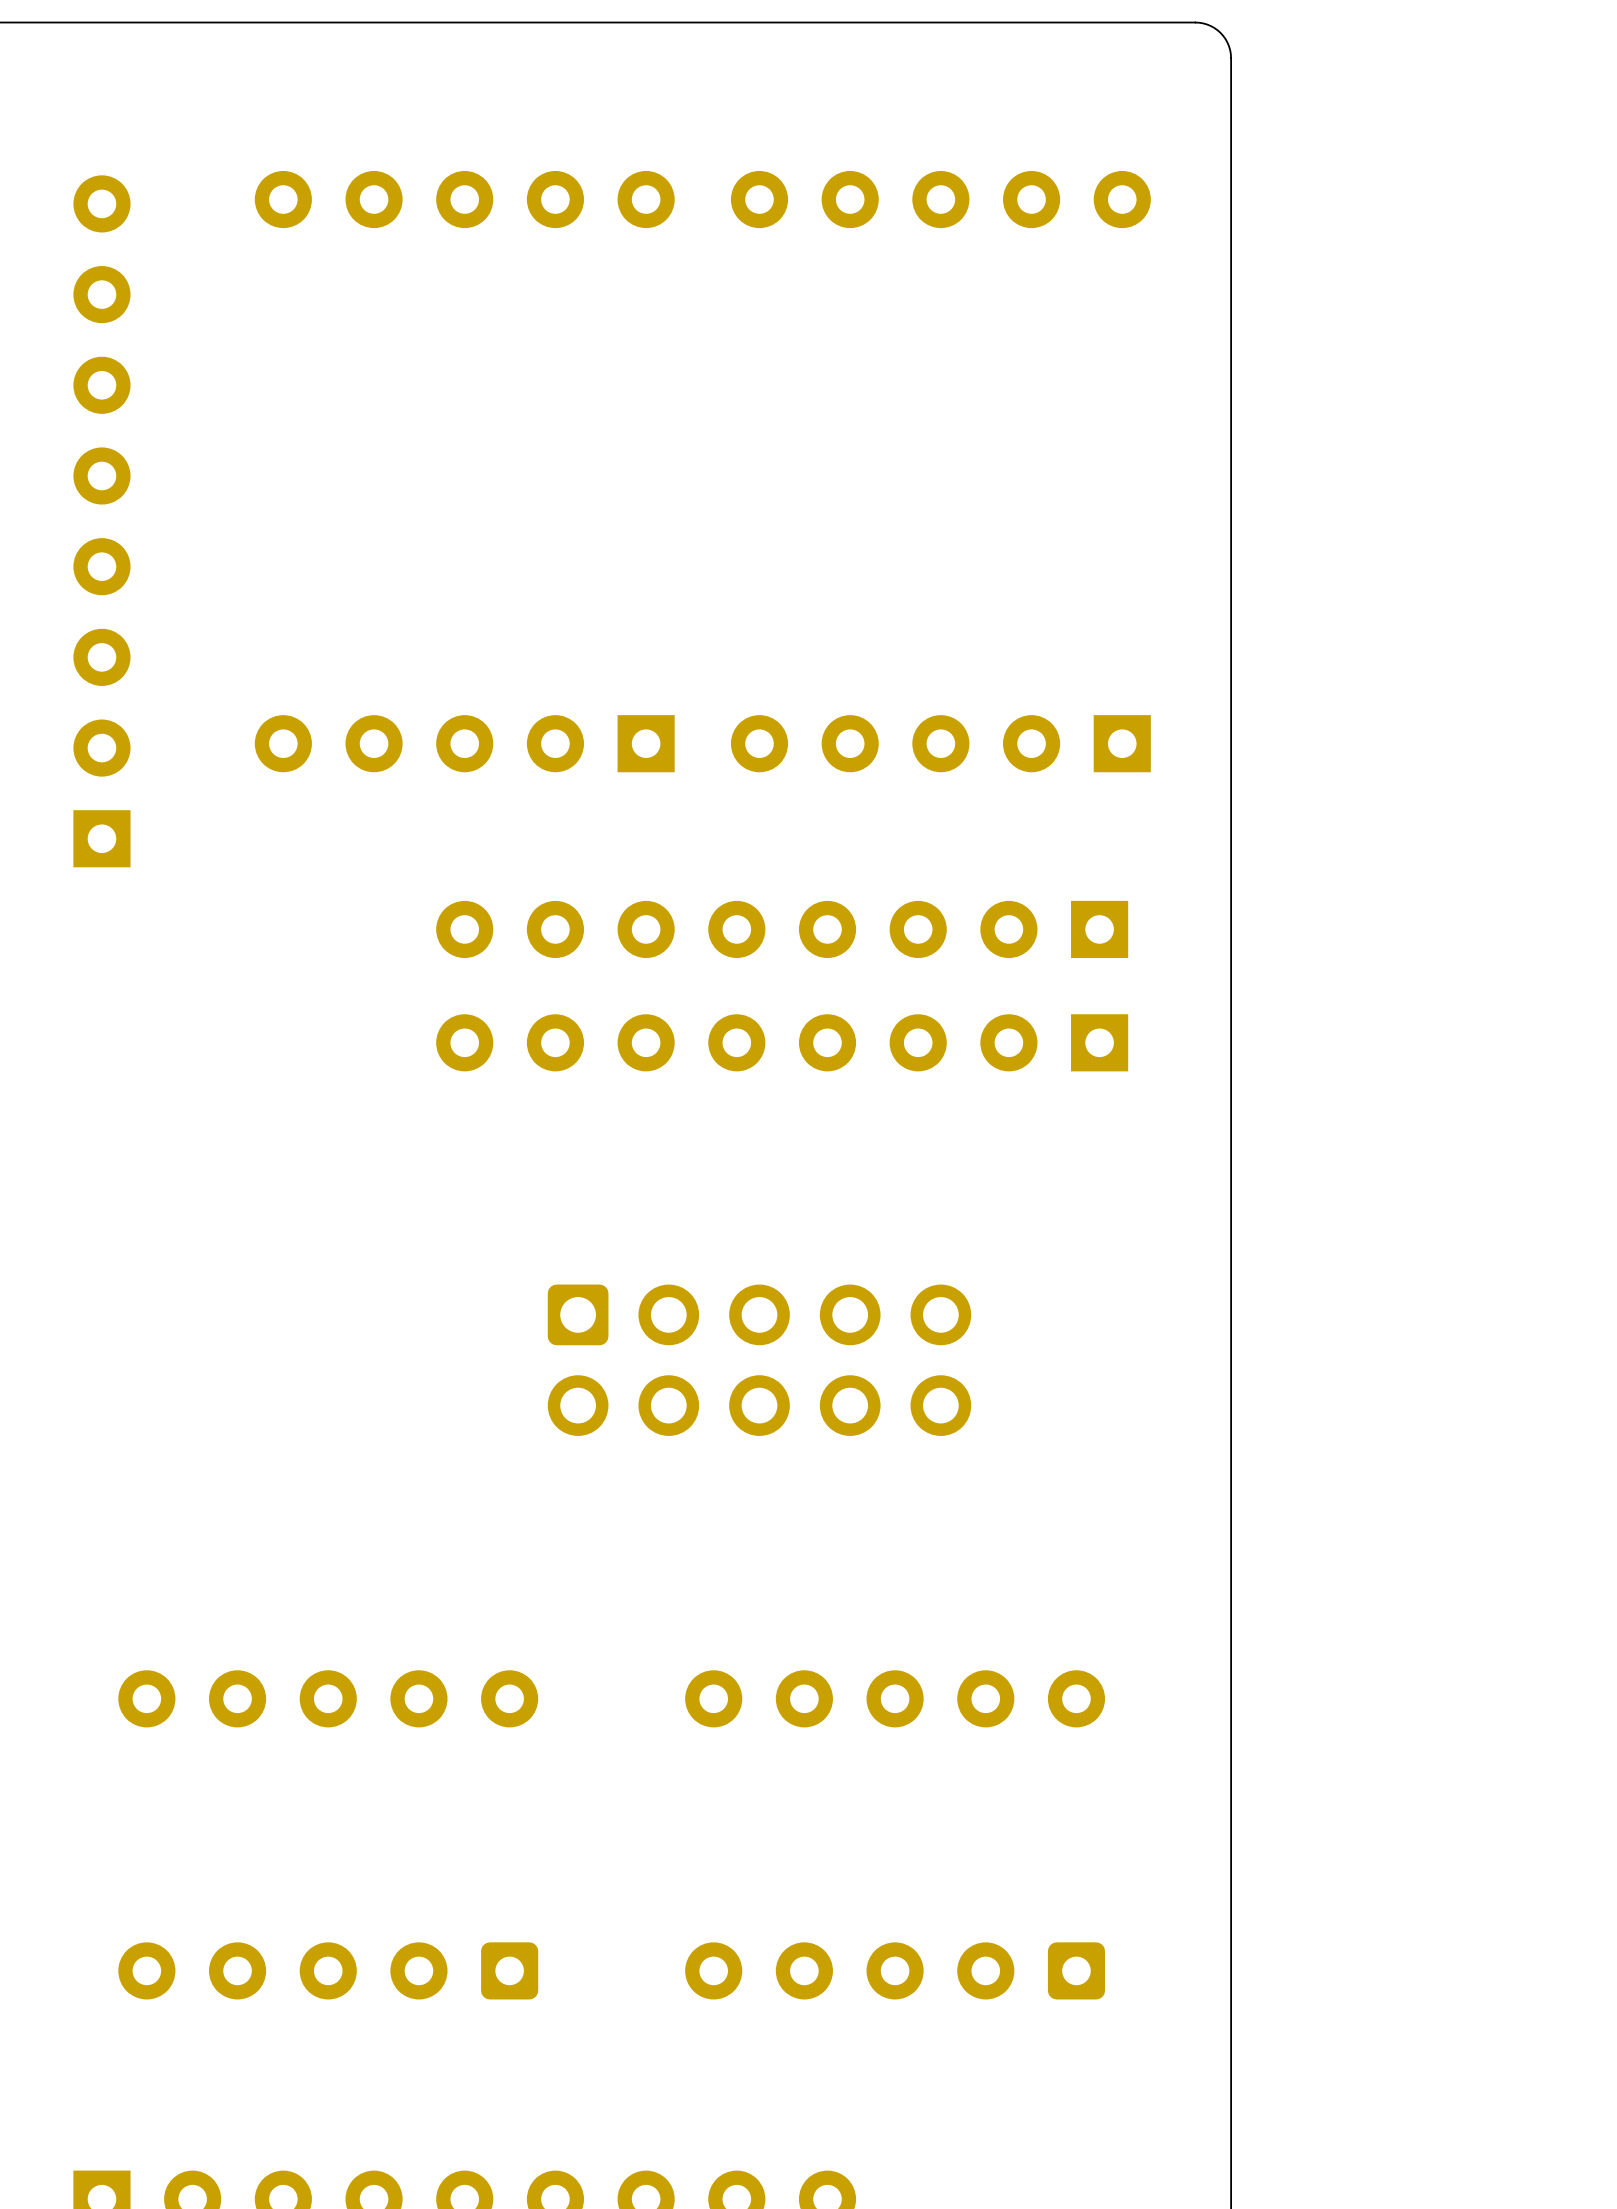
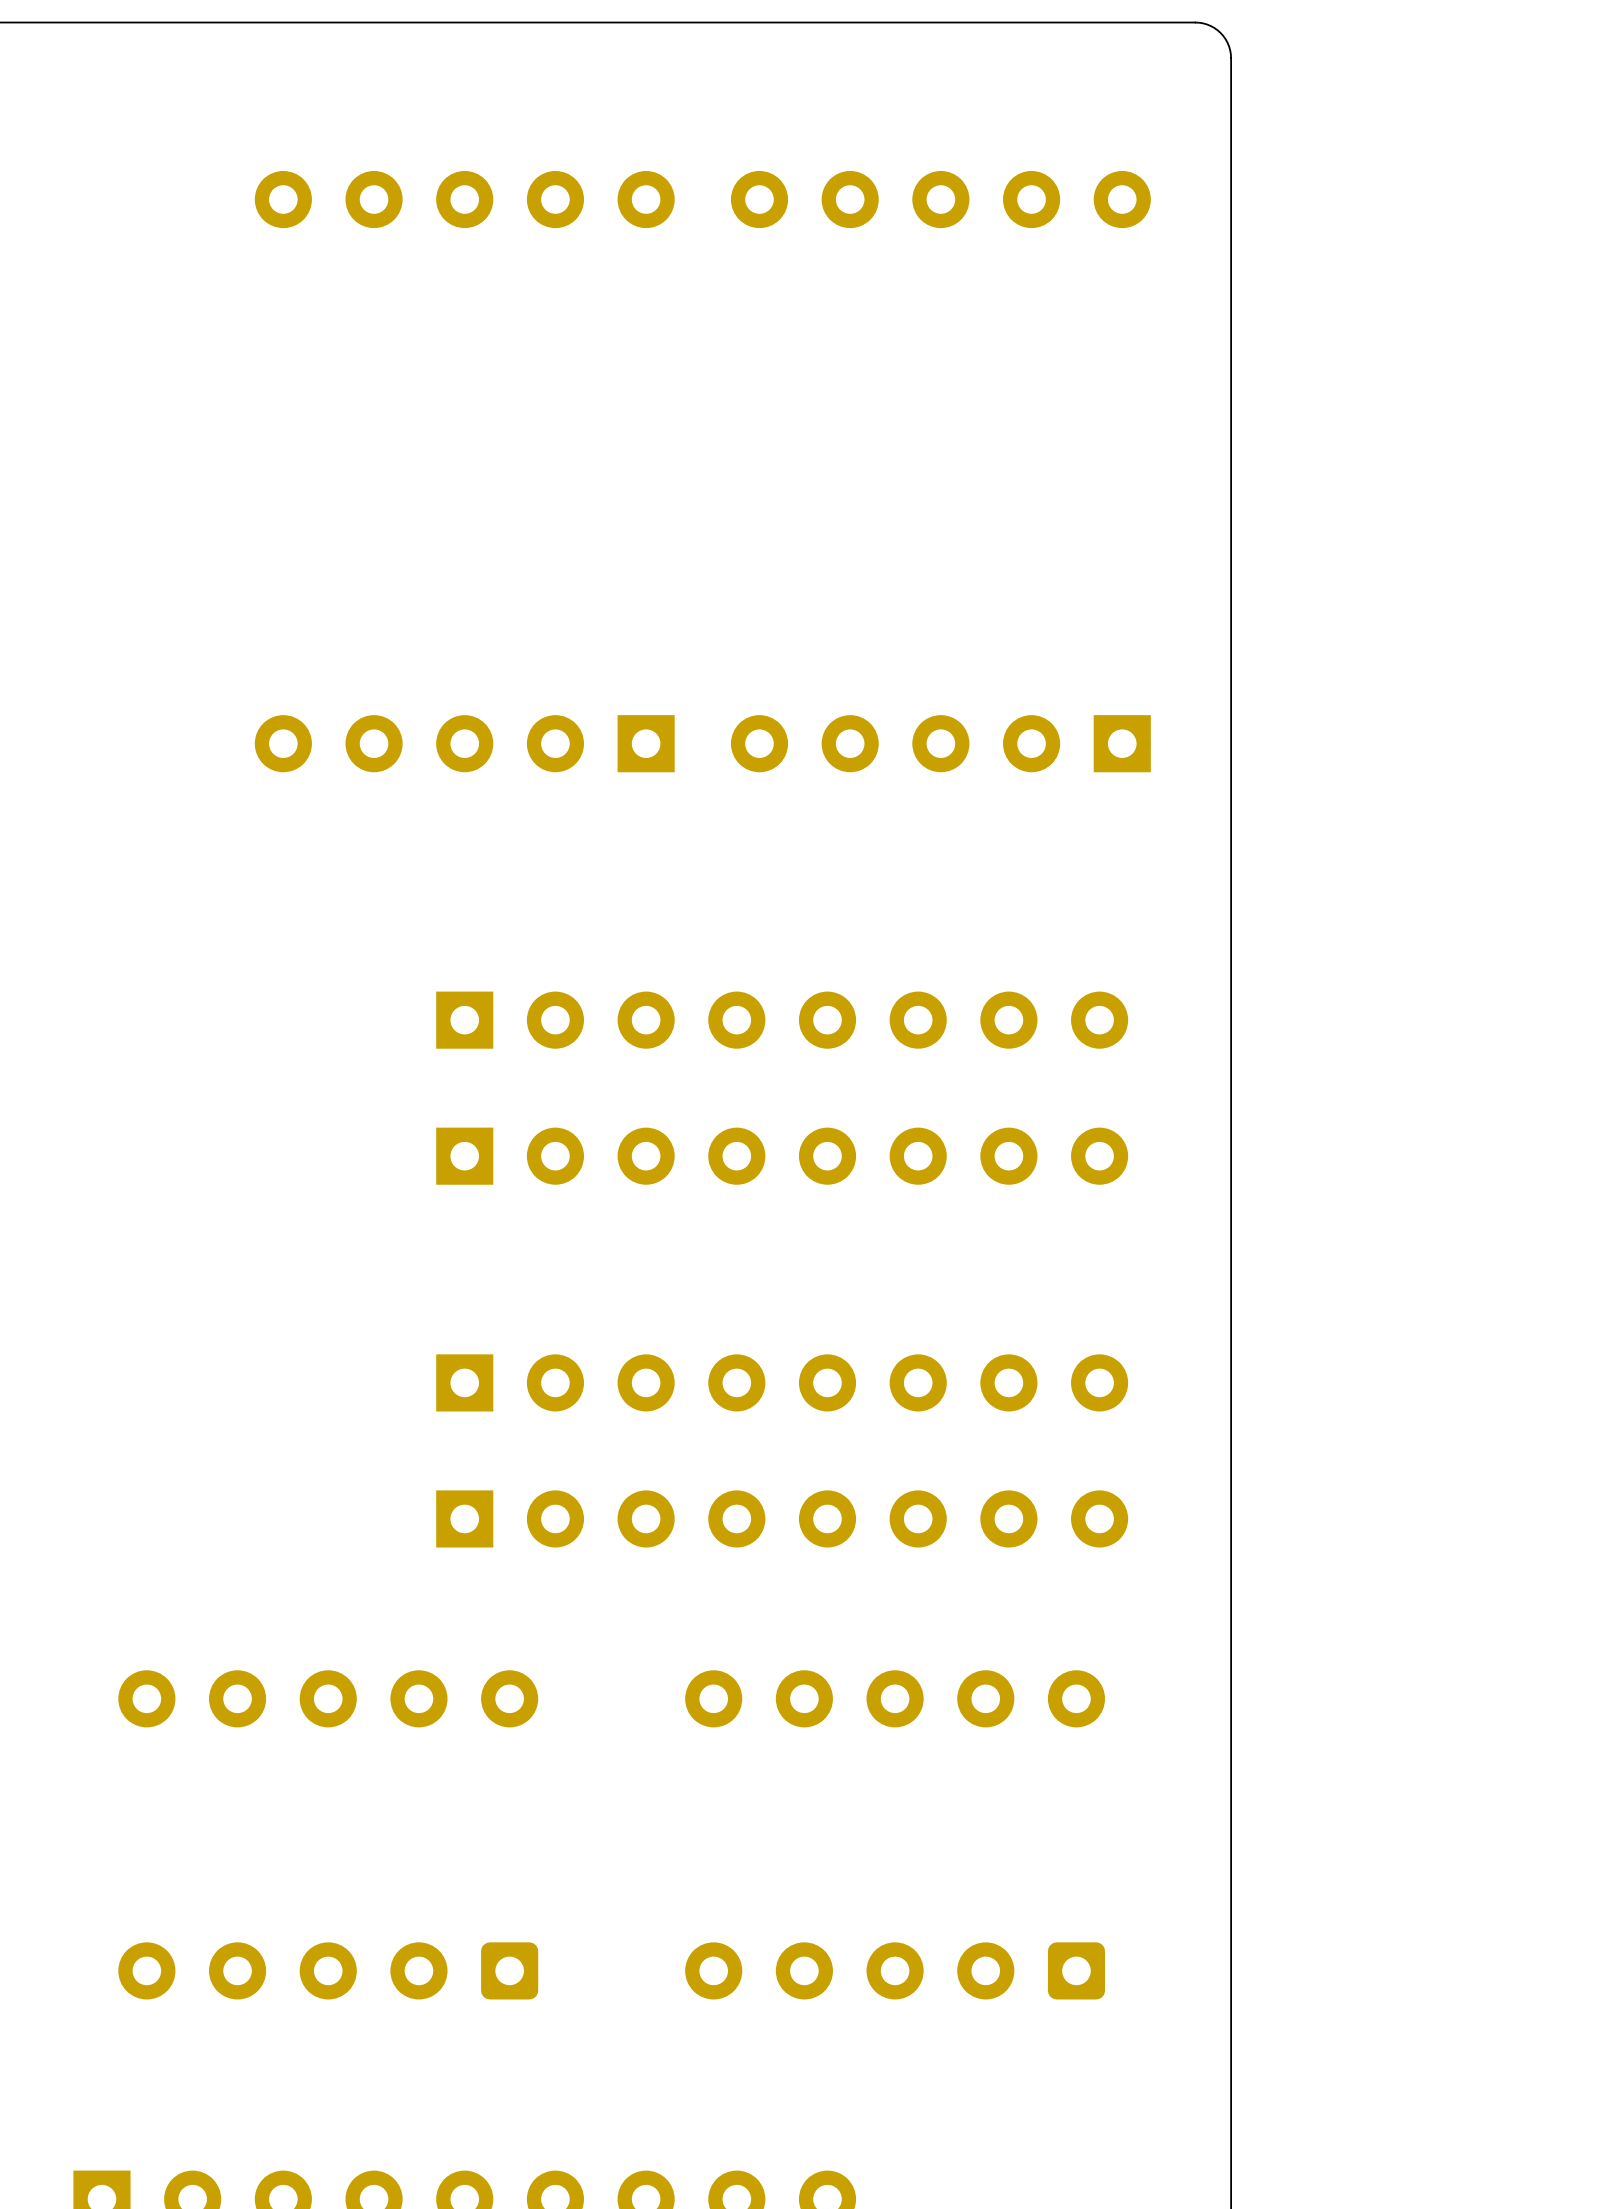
part: (101, 521) -> none
part rotation: 0° (782, 929) -> 180° (782, 1156)
part rotation: 0° (782, 1042) -> 180° (782, 1020)
part footprint: [547, 1284, 972, 1436] -> [436, 1354, 1129, 1412]
part: none -> (782, 1518)

